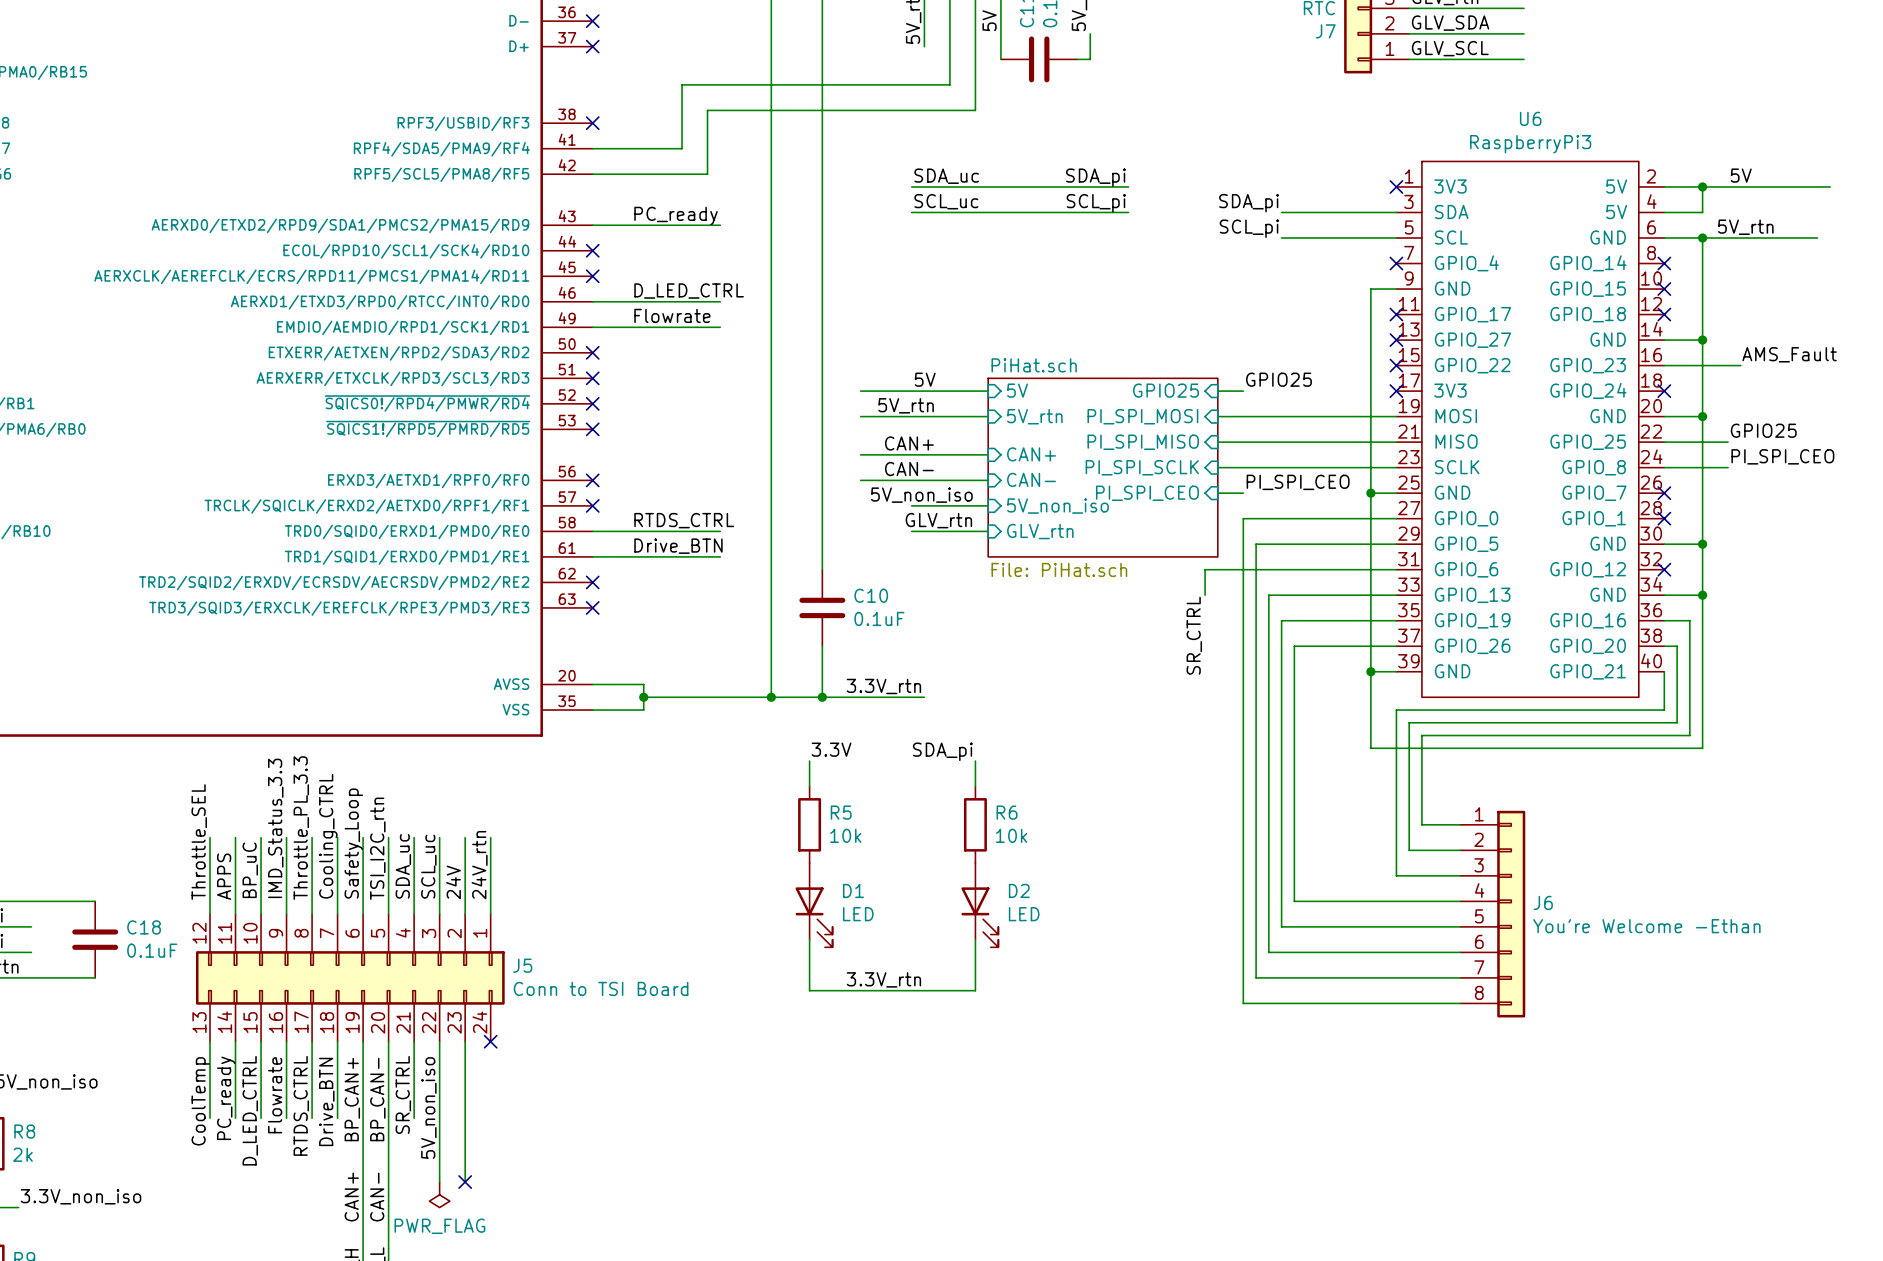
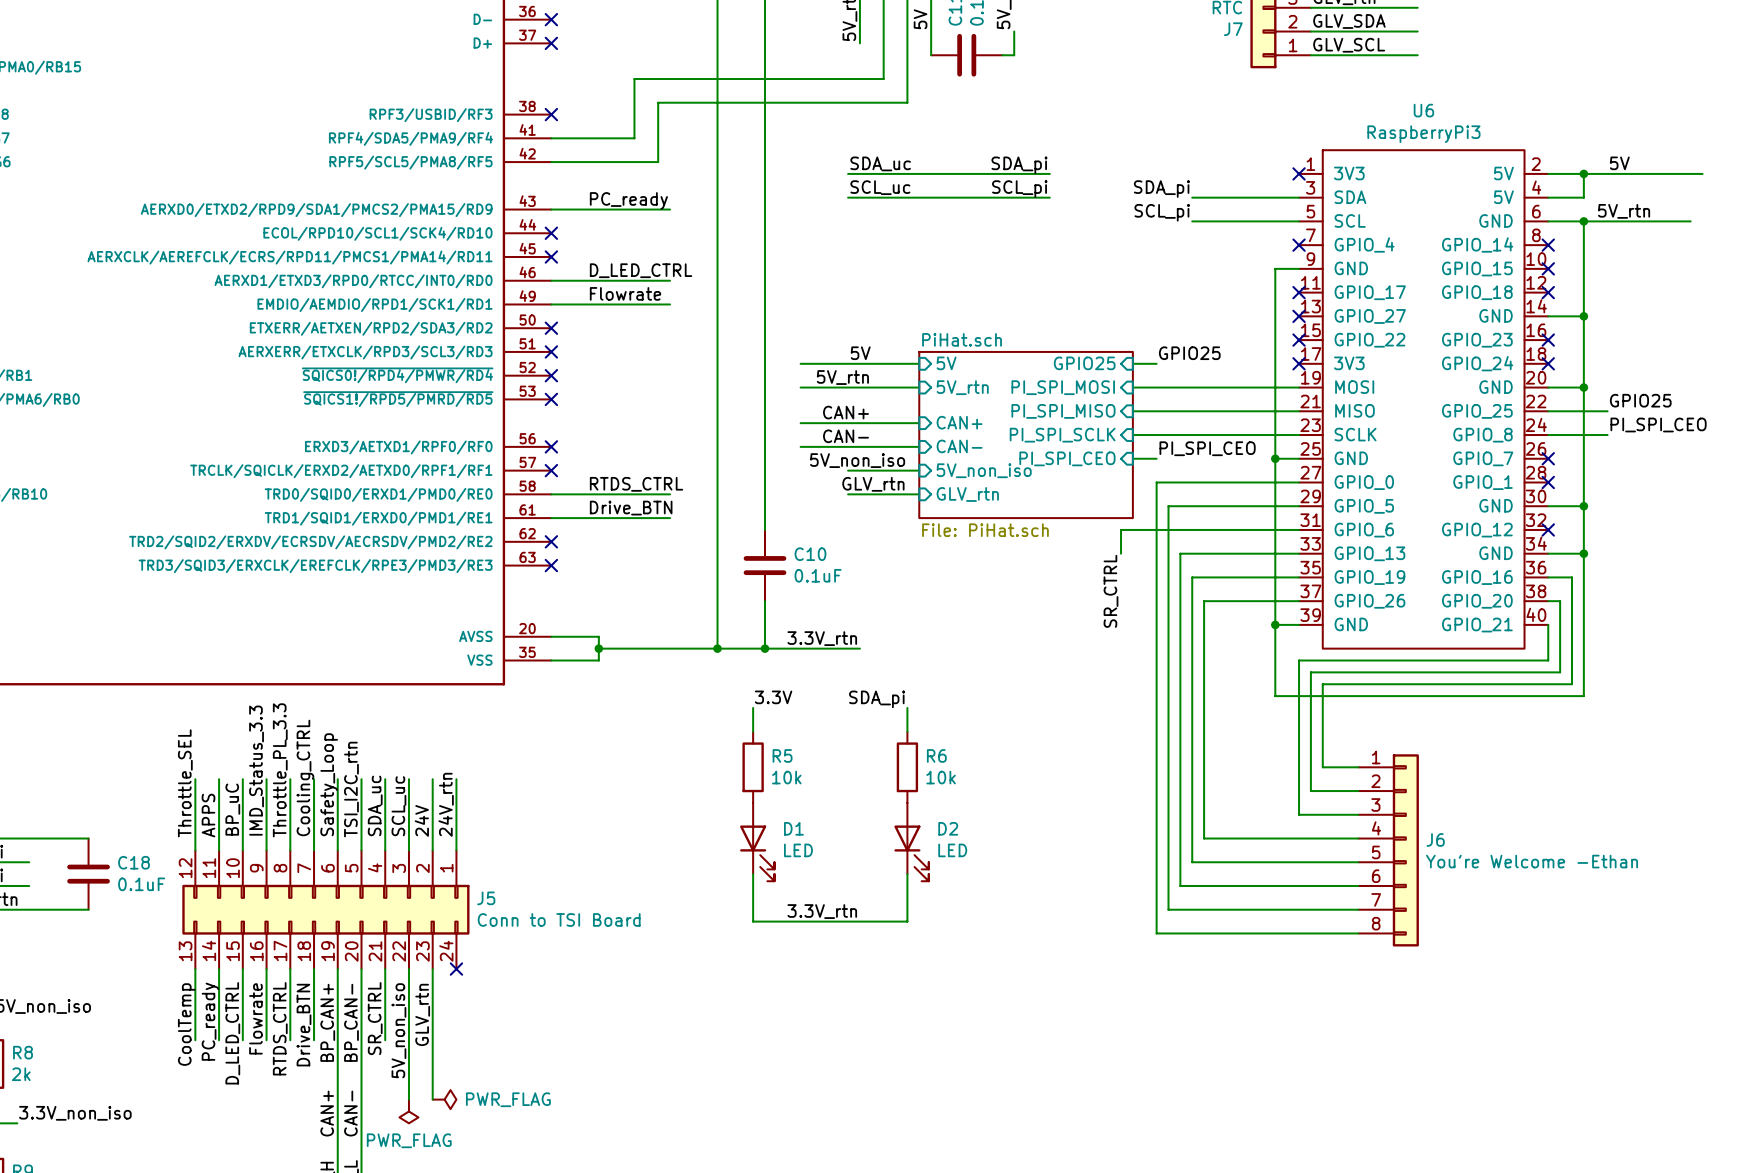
label: AMS_Fault (1789, 354) -> none
wire: (1664, 365) (1740, 365) -> none
no-connect mark: none -> (1548, 340)
label: none -> GLV_rtn (422, 1014)
no-connect mark: (465, 1182) -> none
power symbol: none -> PWR_FLAG (444, 1099)

